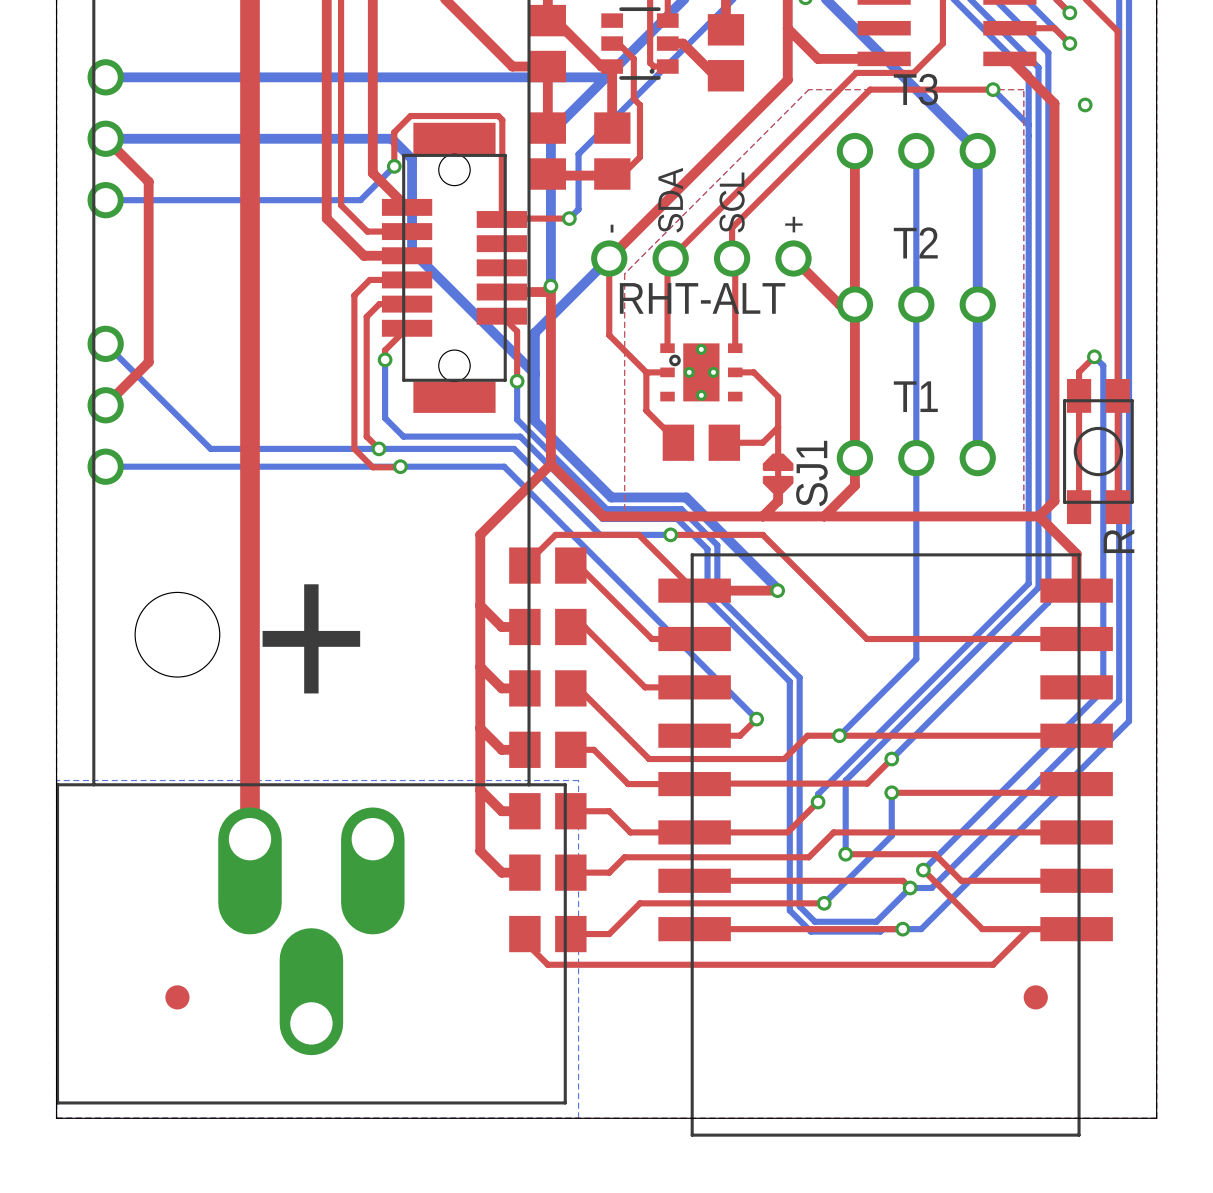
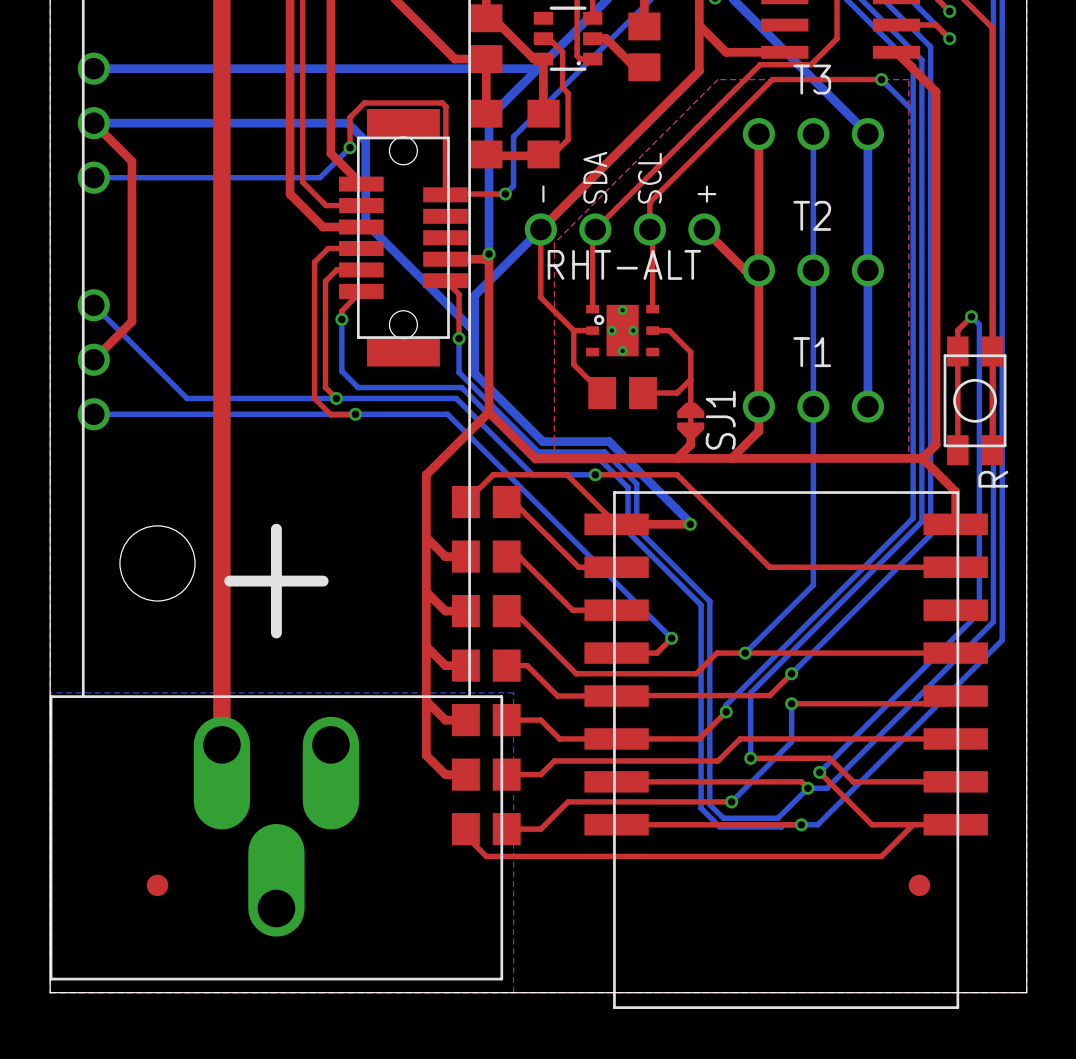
via: (1085, 104) -> none

